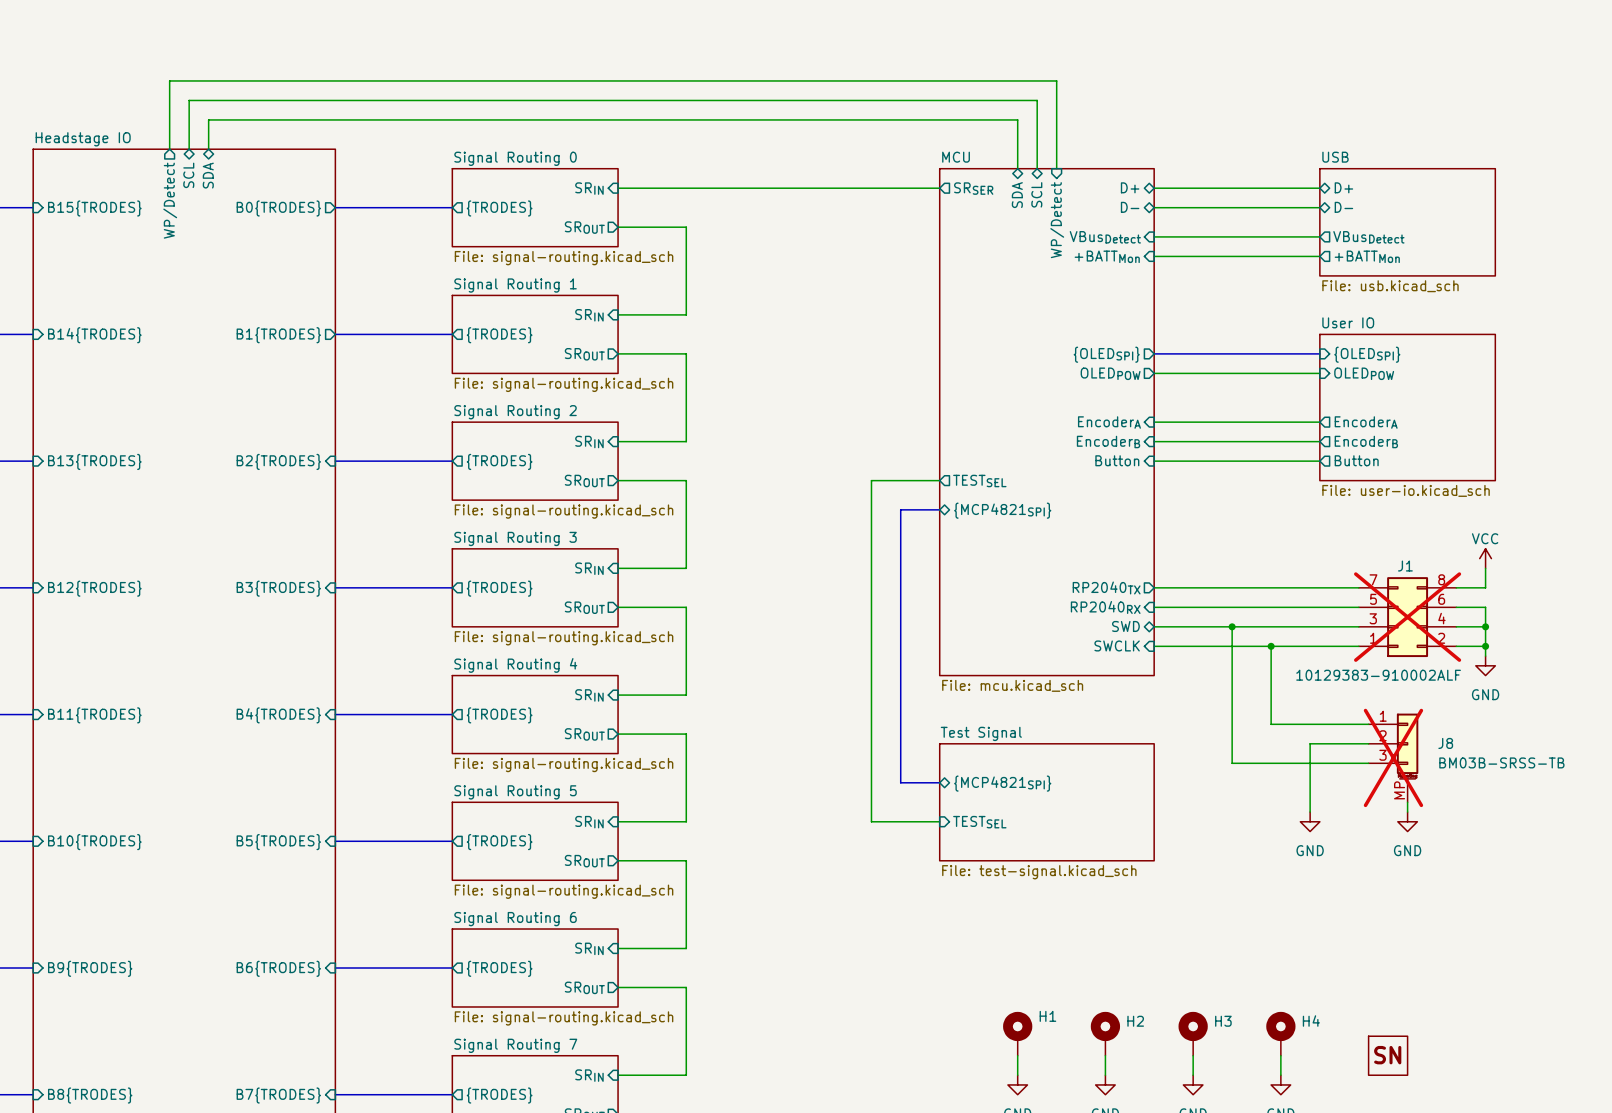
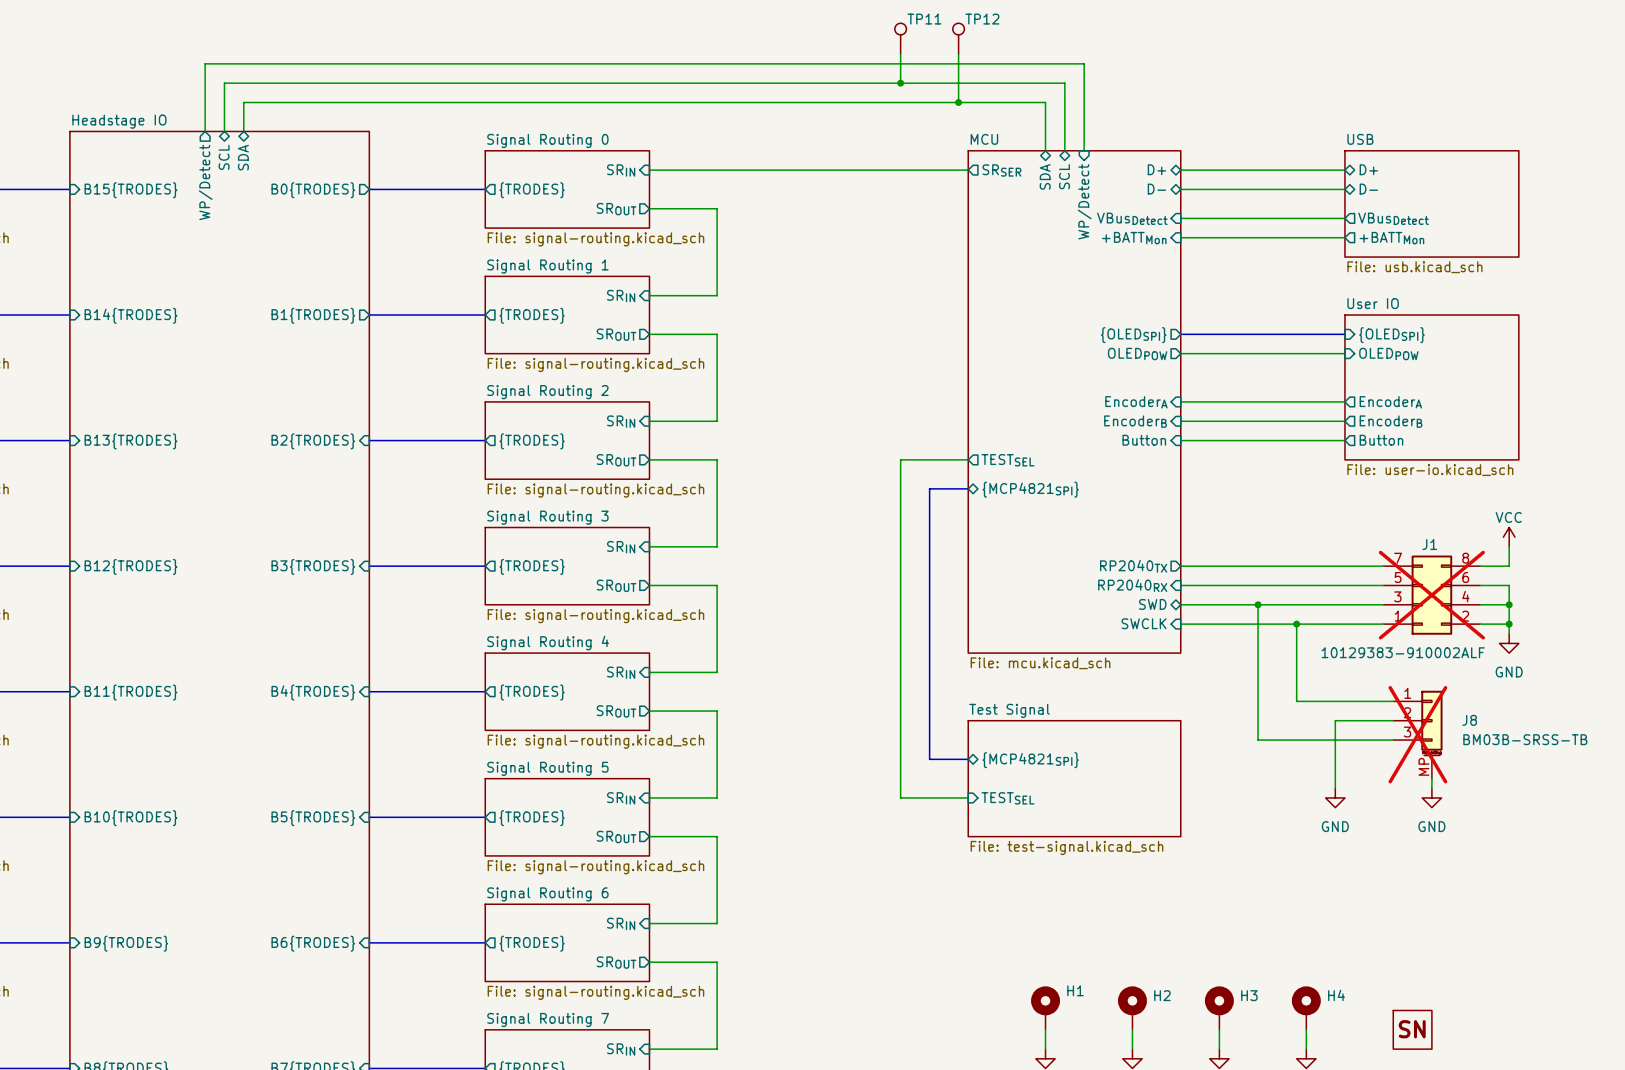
TP11: none -> (900, 38)
TP12: none -> (958, 38)
wire: none -> (900, 54) (900, 83)
wire: none -> (958, 54) (958, 102)
junction: none -> (900, 83)
junction: none -> (958, 102)

